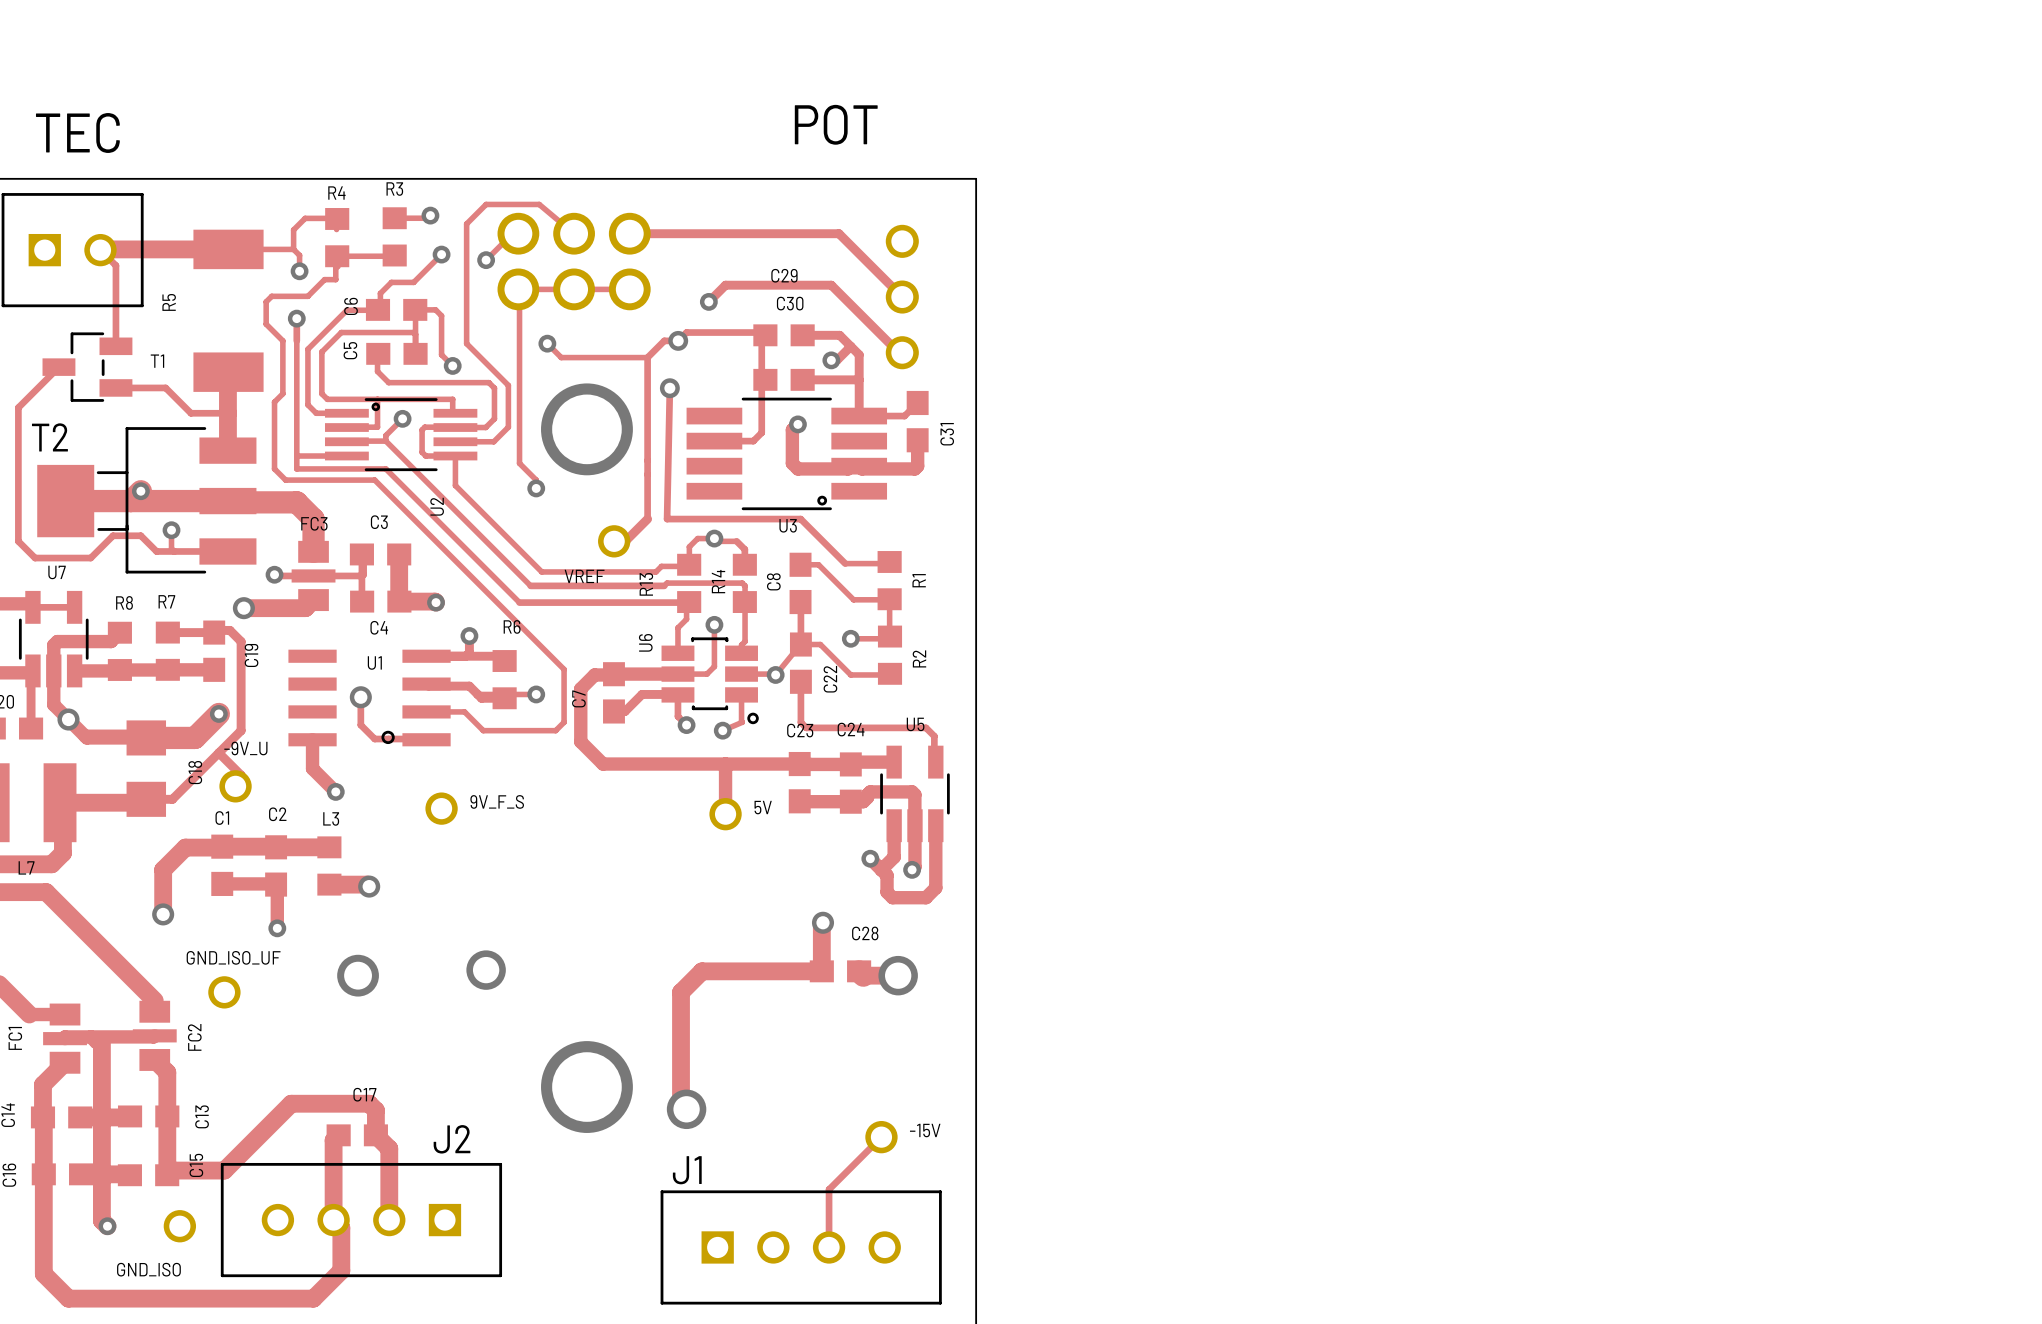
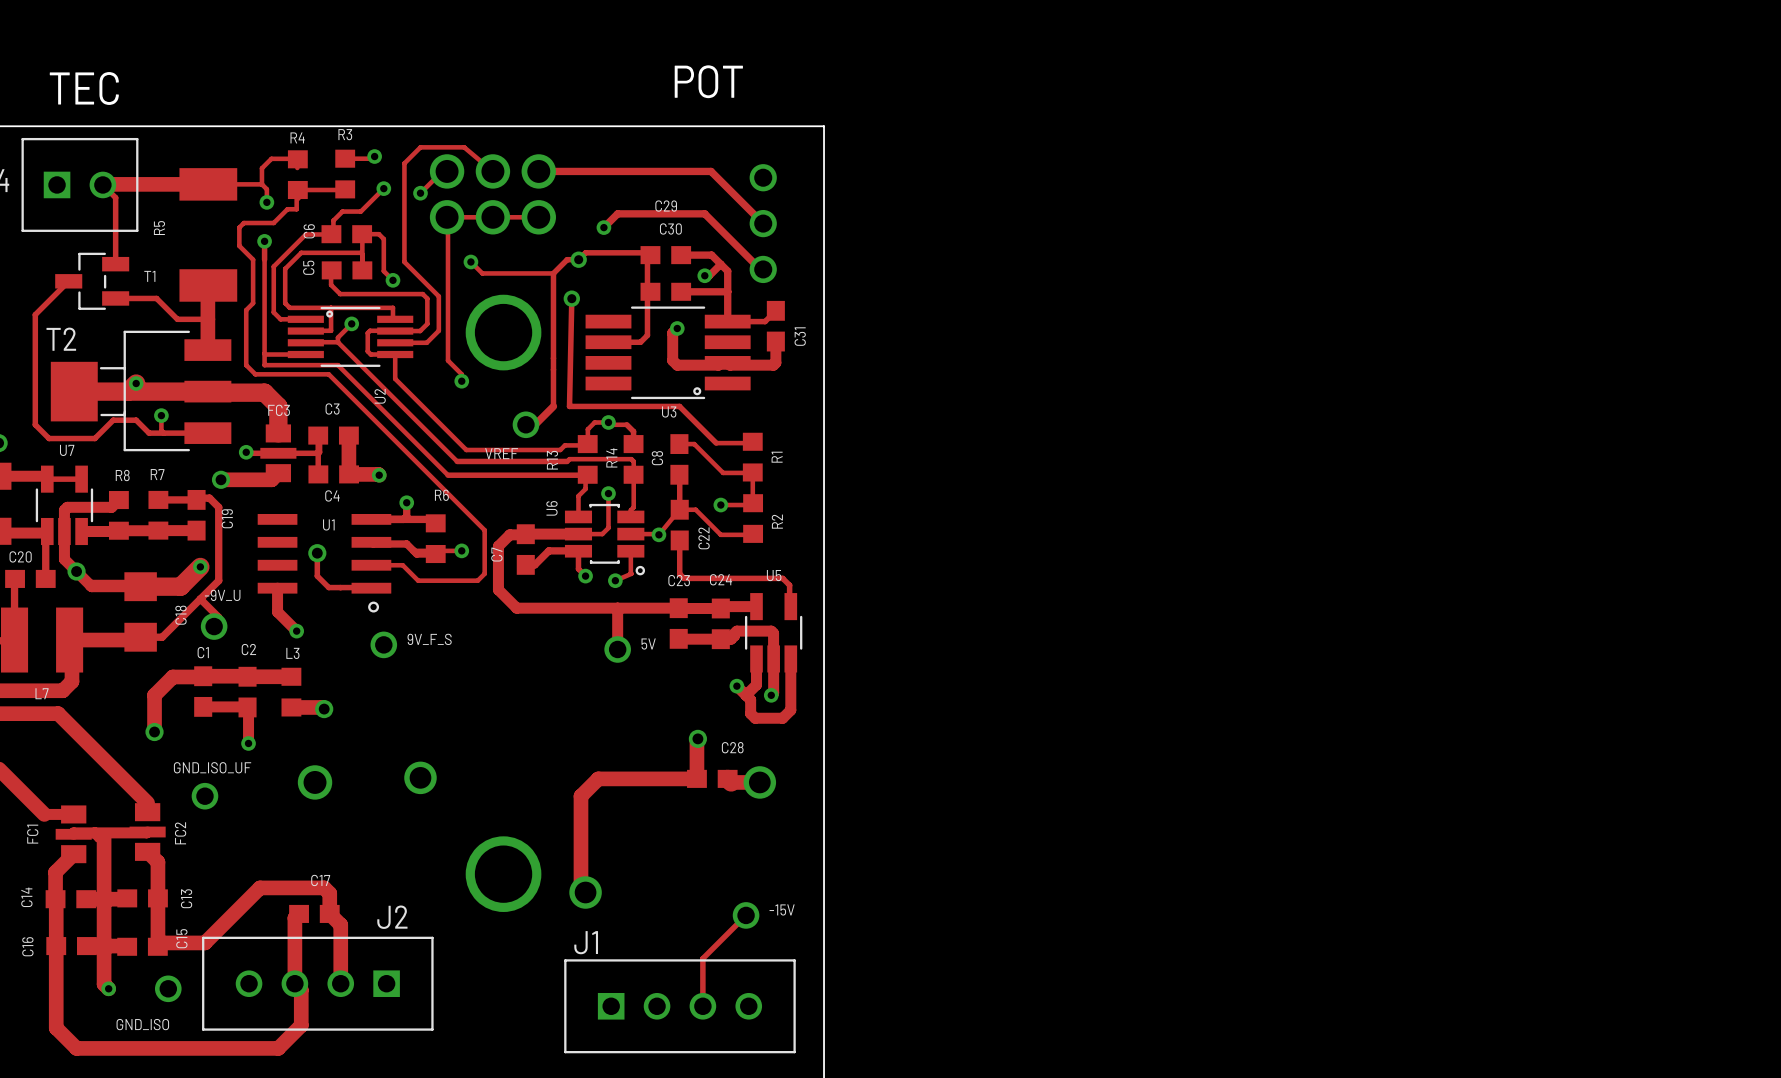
U1 footprint: [288, 649, 451, 747] -> [257, 513, 392, 613]

